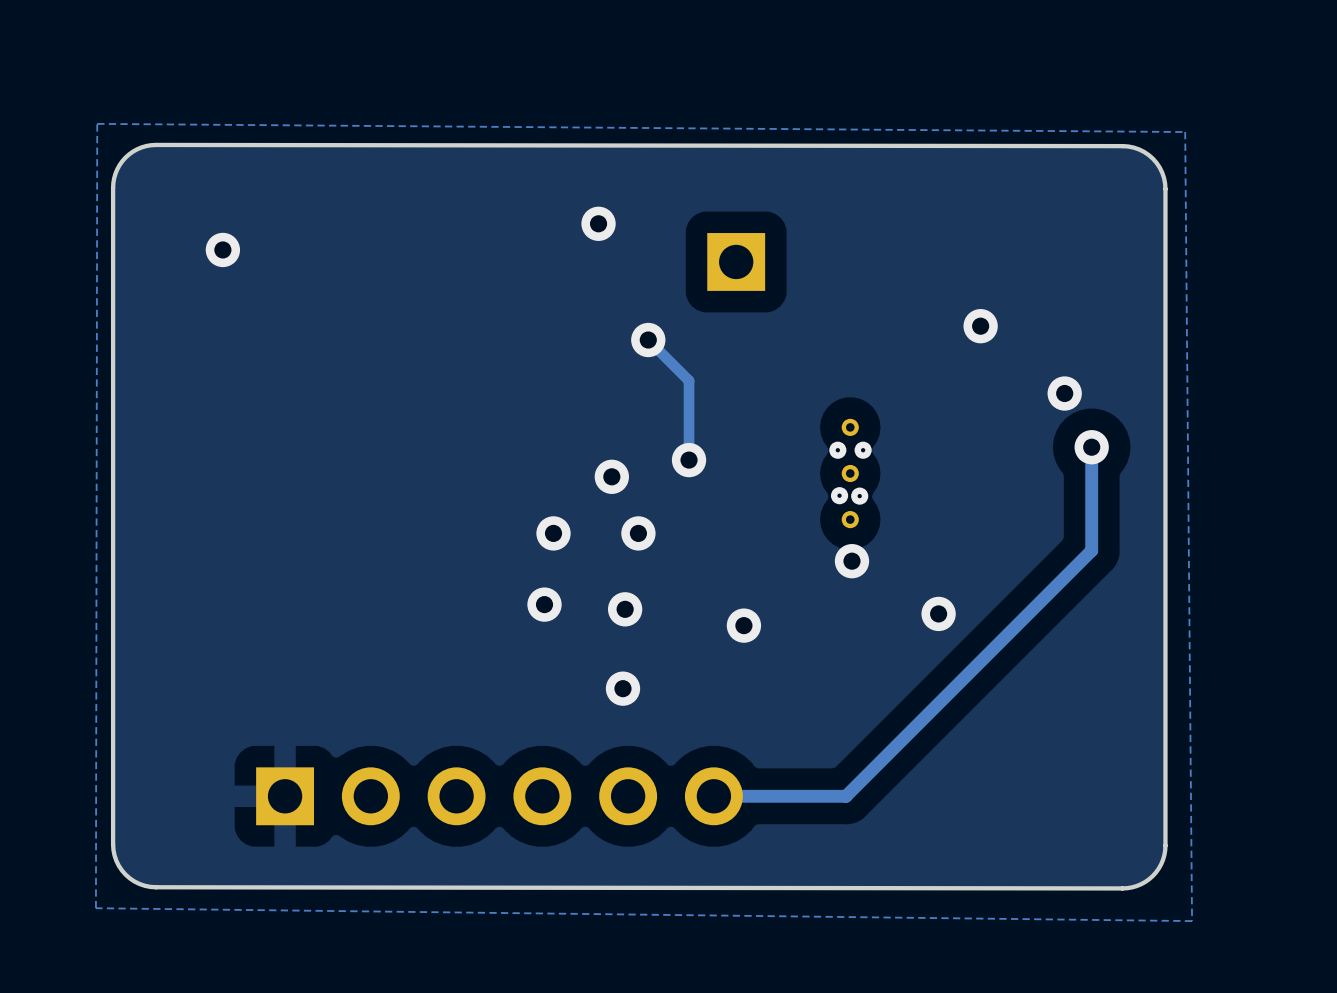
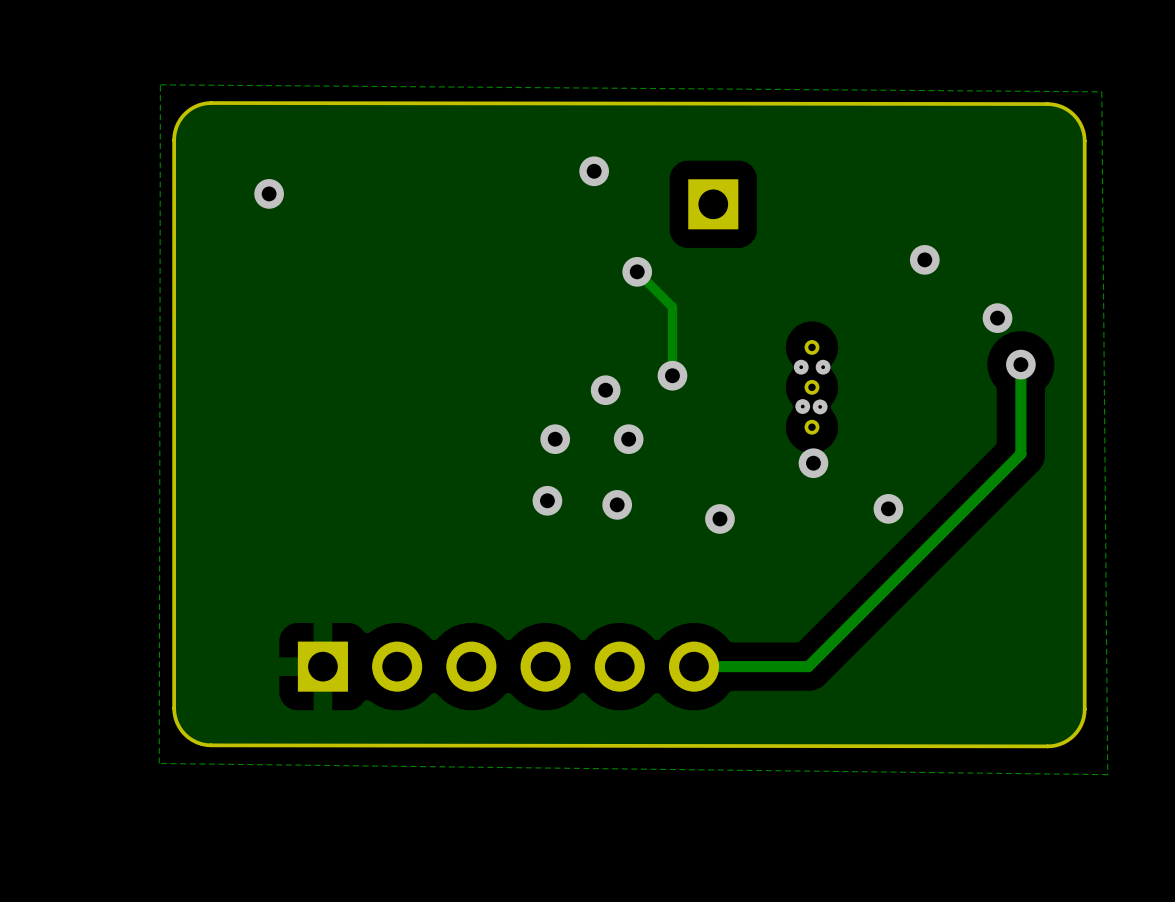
via: (622, 688) -> none

